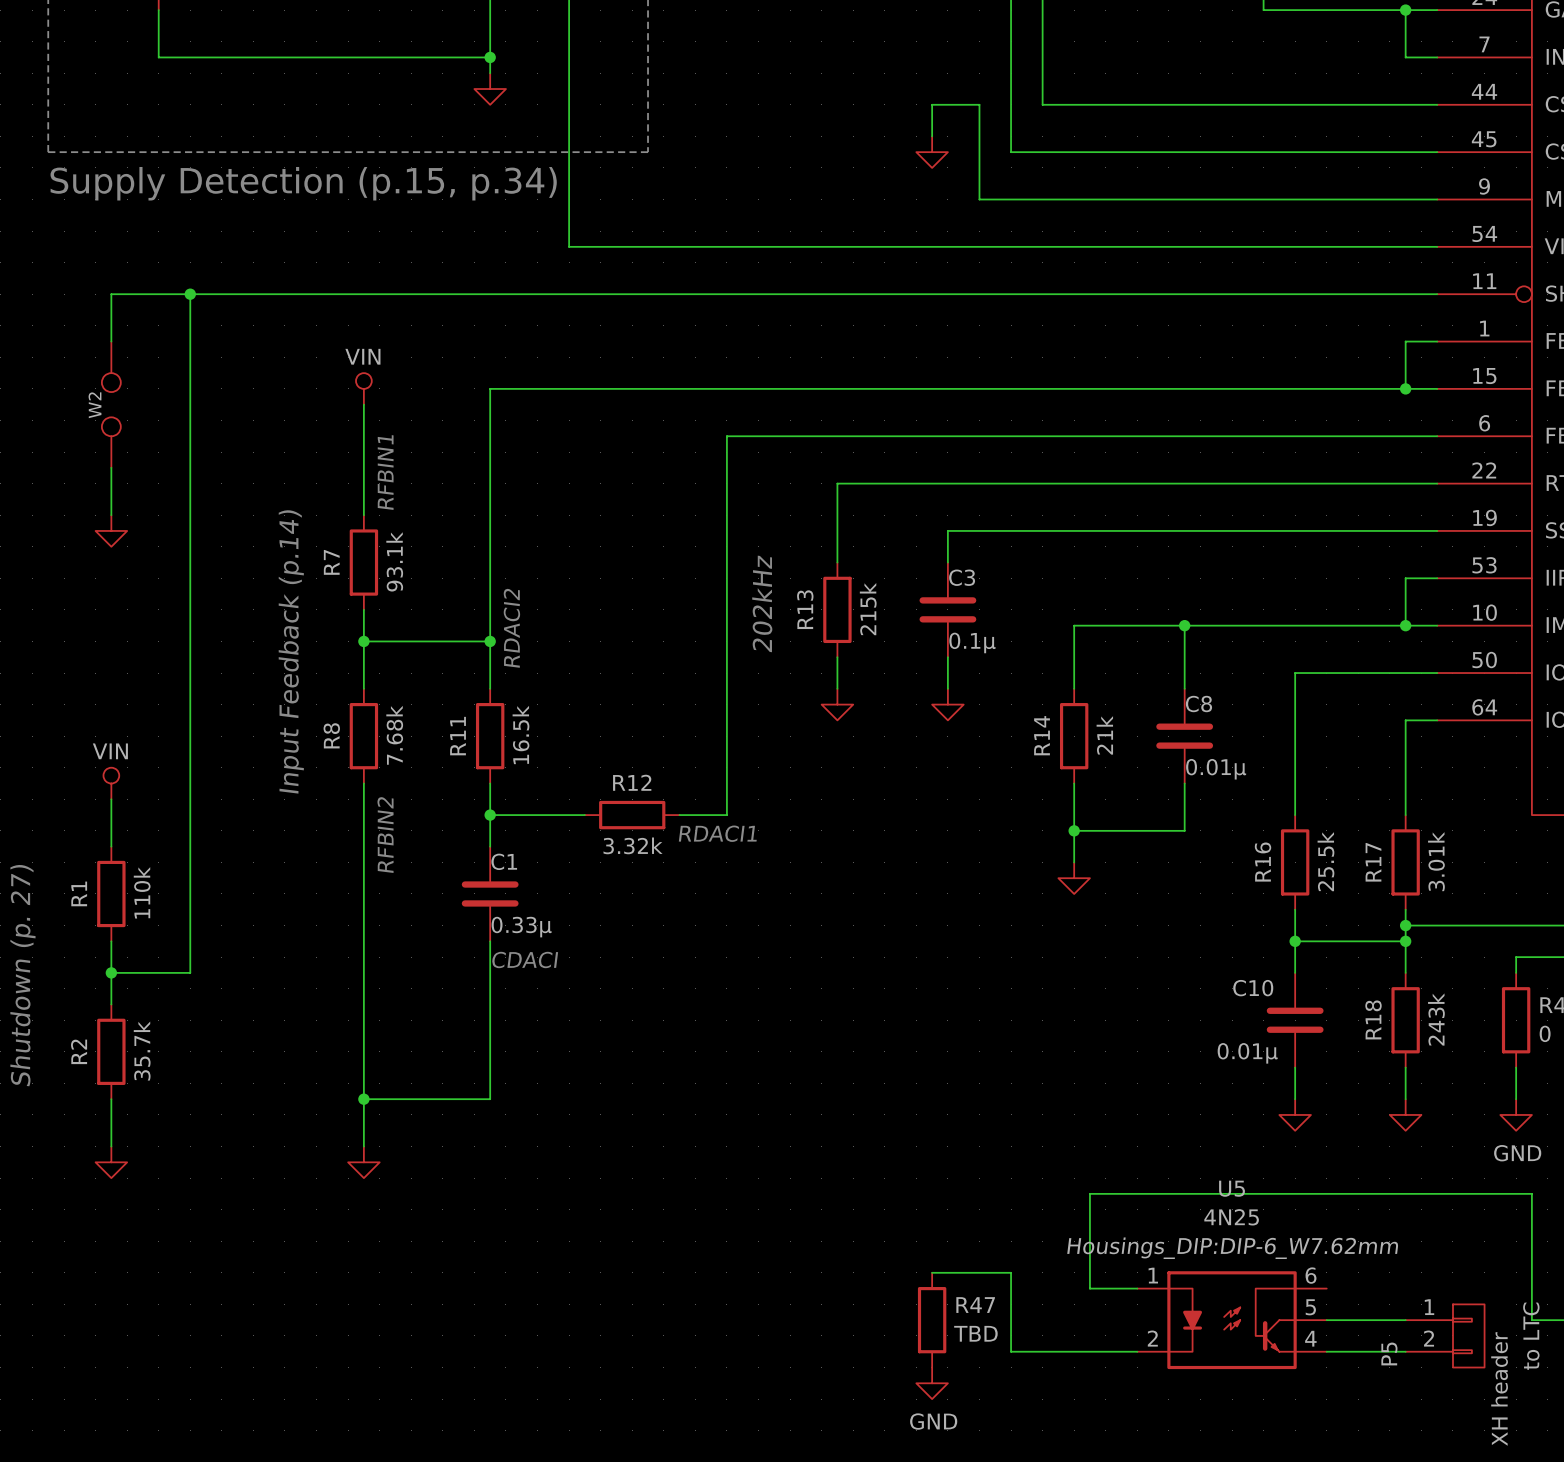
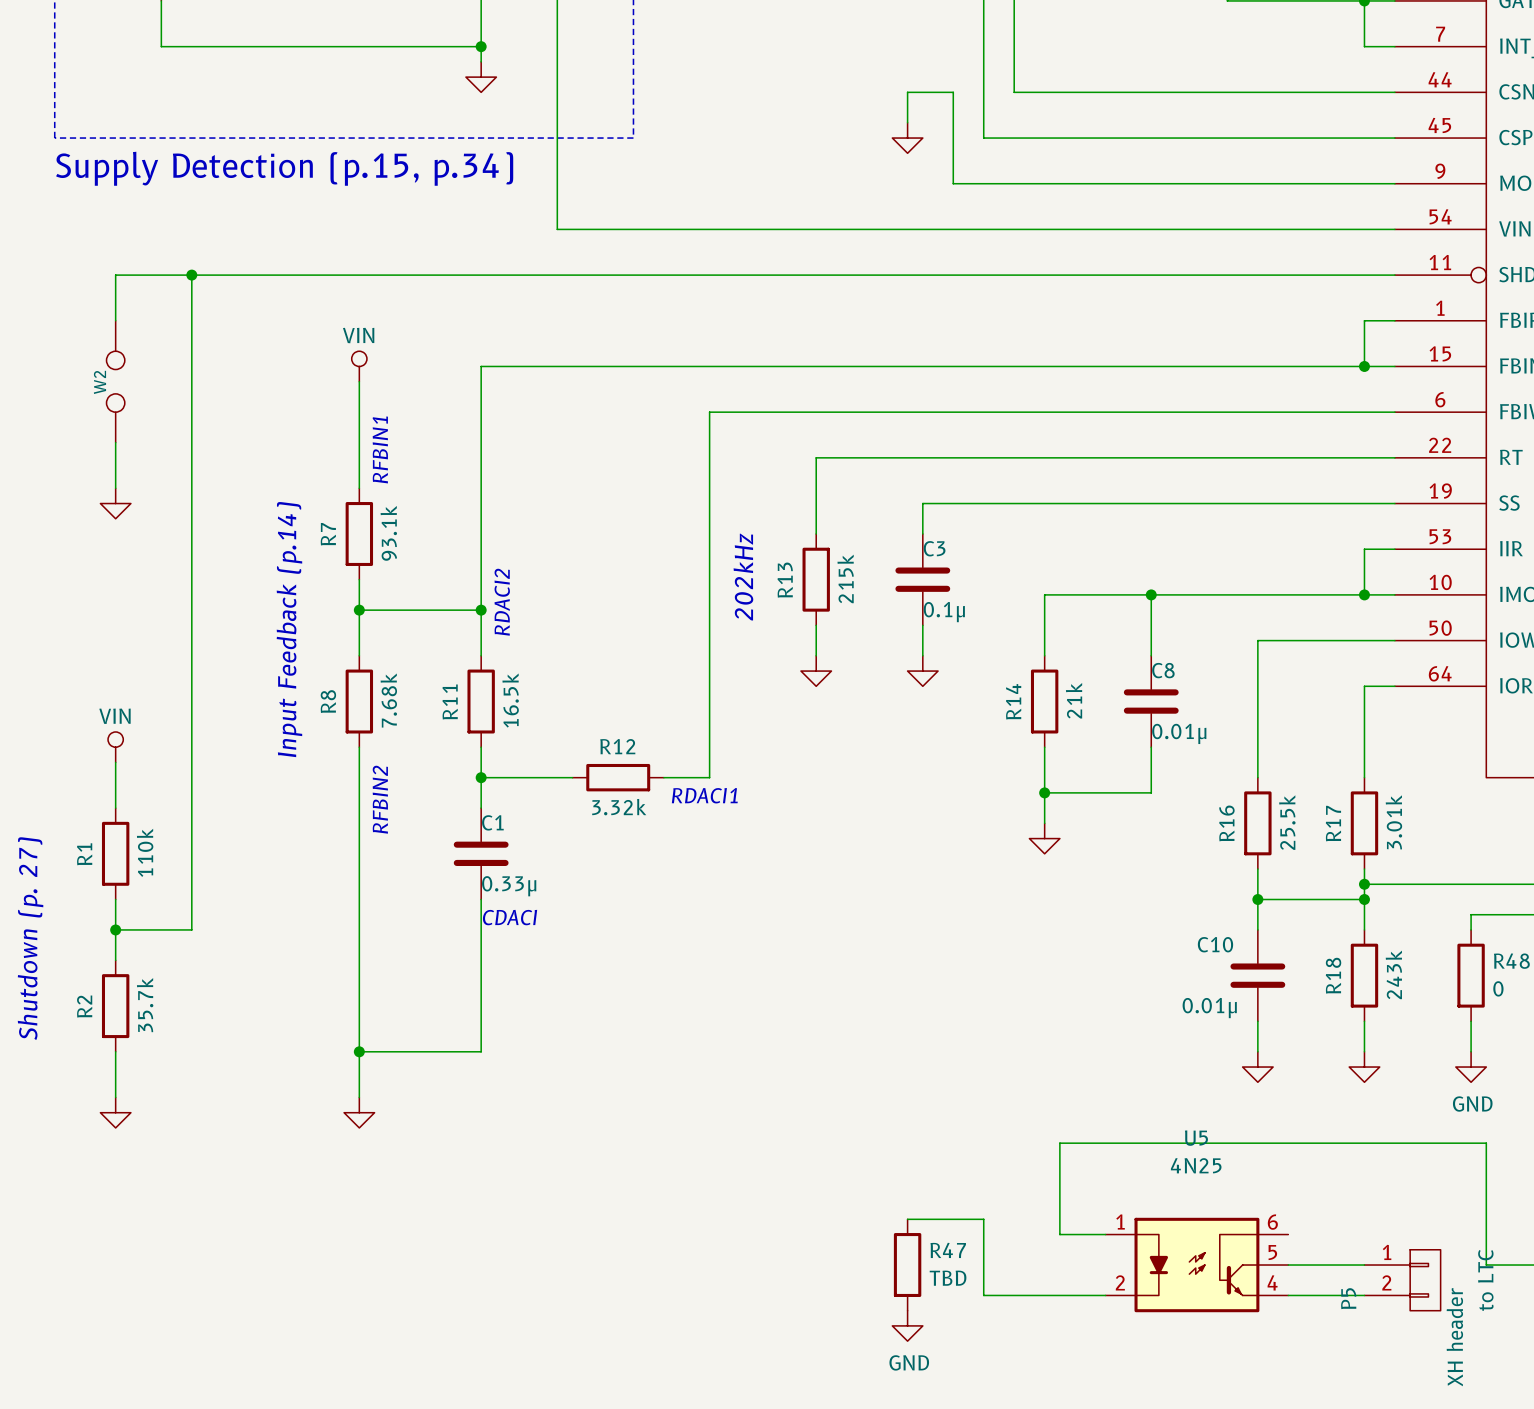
U5 text: Housings_DIP:DIP-6_W7.62mm (1232, 1248) -> none

